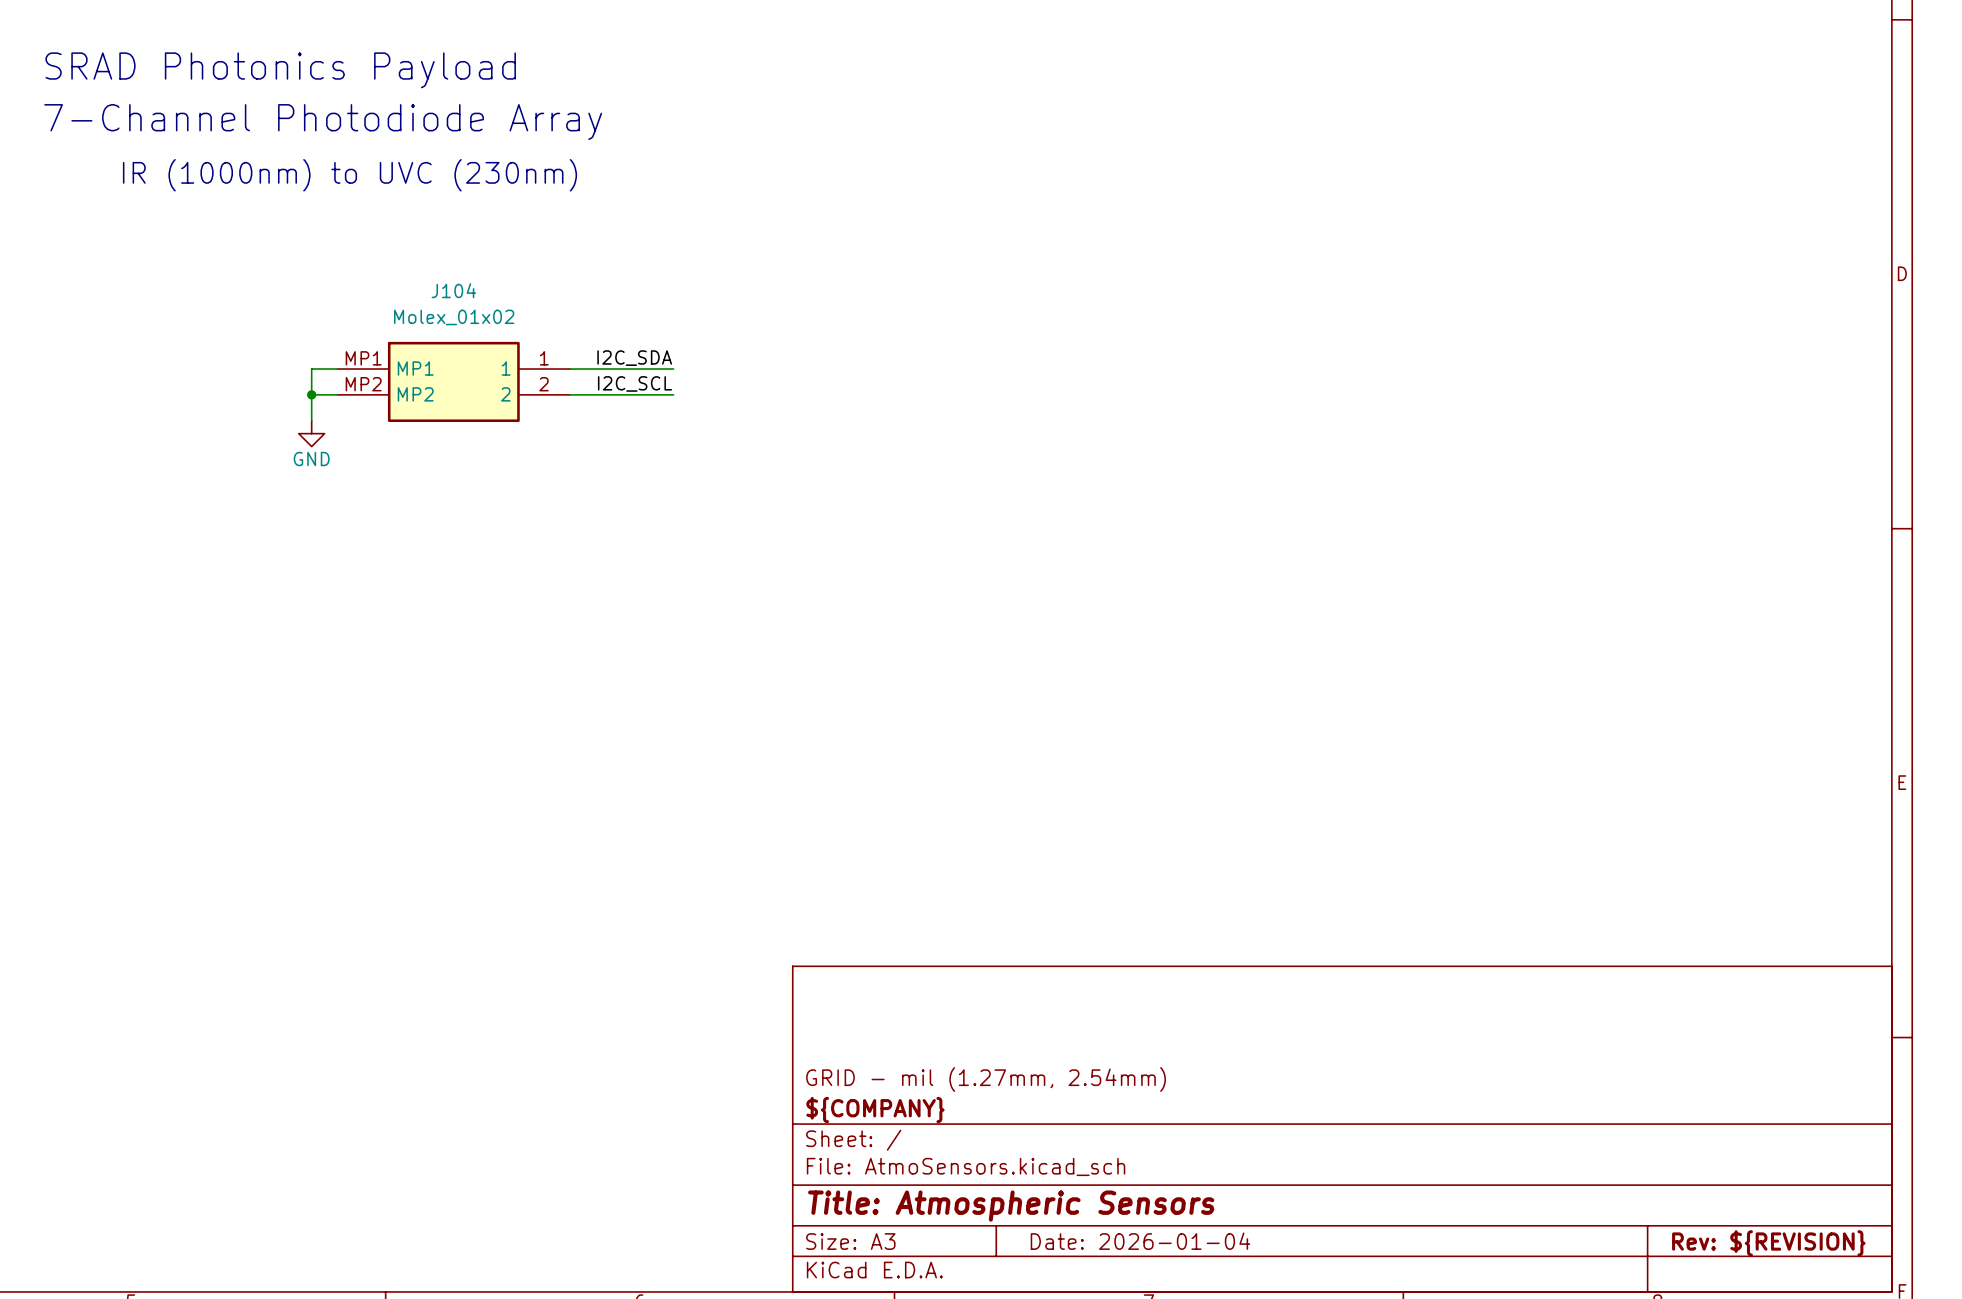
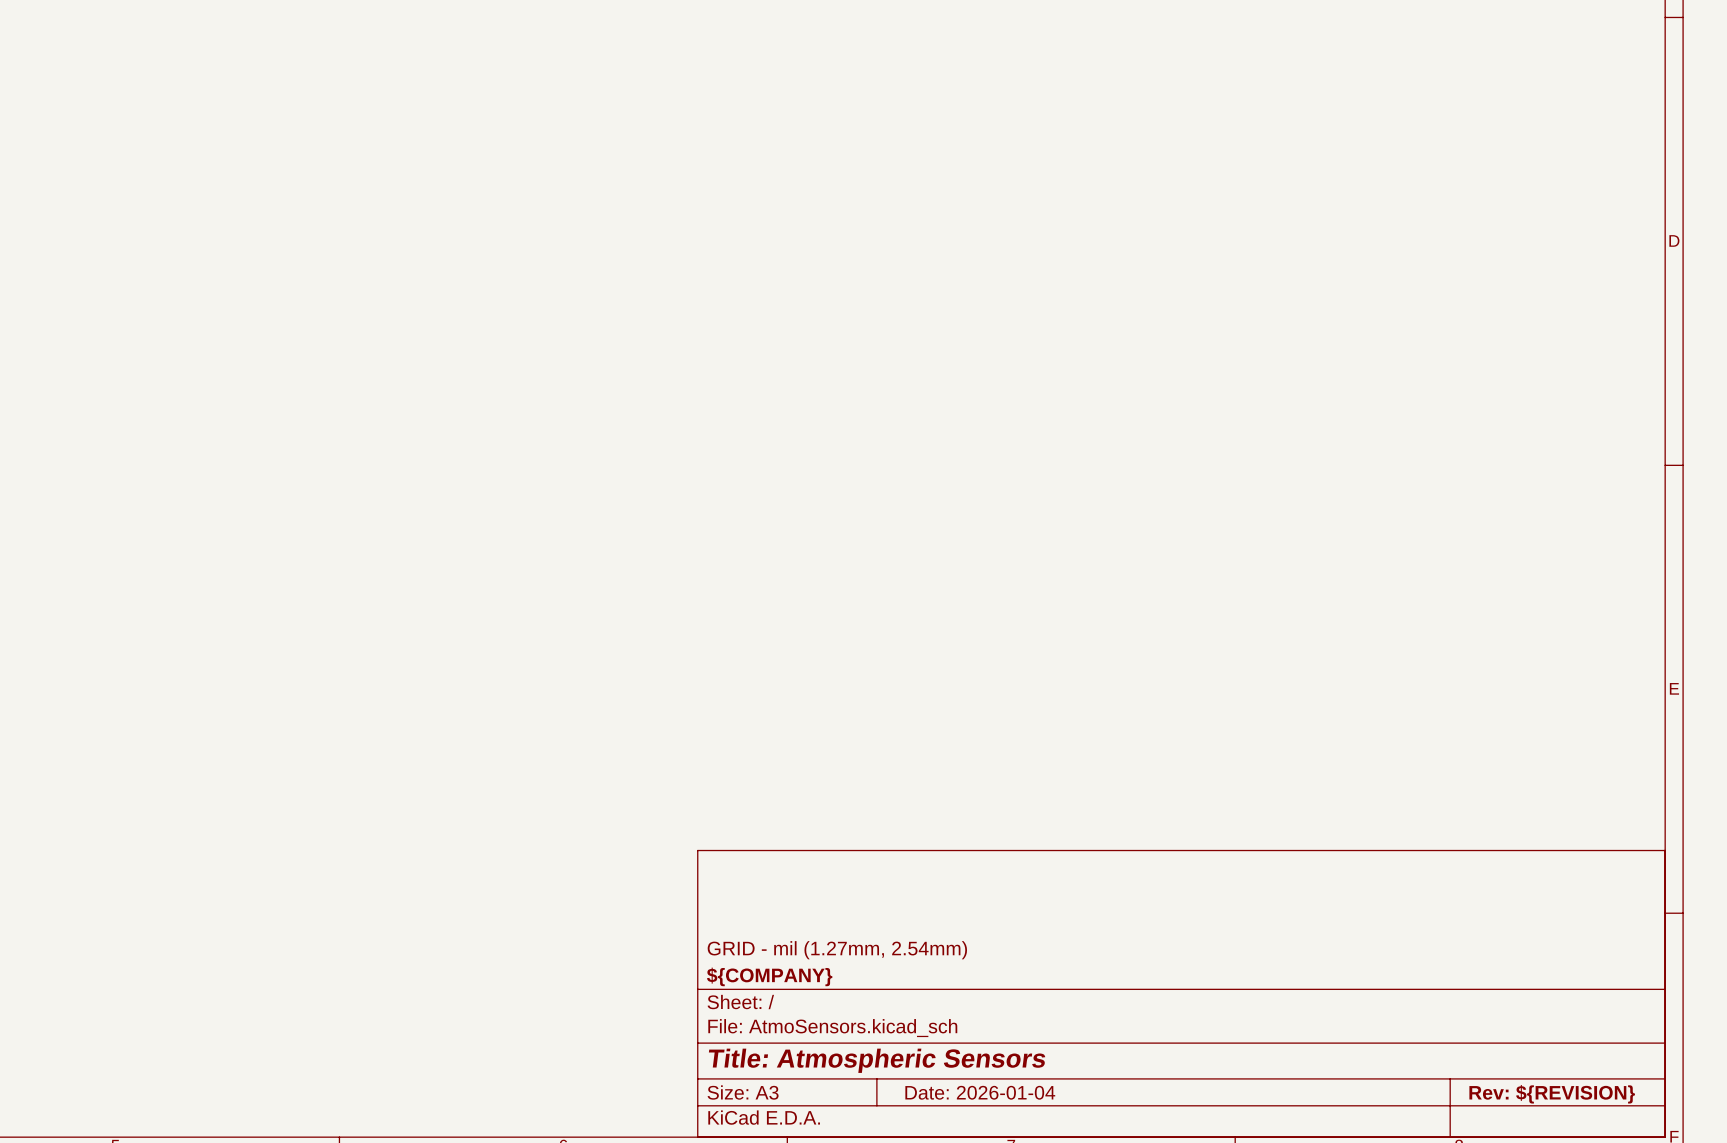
text: SRAD Photonics Payload (280, 70) -> none
text: 7-Channel Photodiode Array (323, 122) -> none
text: IR (1000nm) to UVC (230nm) (349, 175) -> none
label: I2C_SDA (634, 358) -> none
wire: (337, 369) (311, 369) (311, 420) -> none
wire: (570, 369) (673, 369) -> none
J104: Molex_01x02 (453, 381) -> none
label: I2C_SCL (635, 383) -> none
wire: (311, 394) (337, 394) -> none
junction: (311, 394) -> none
wire: (570, 394) (673, 394) -> none
power symbol: GND (311, 433) -> none

